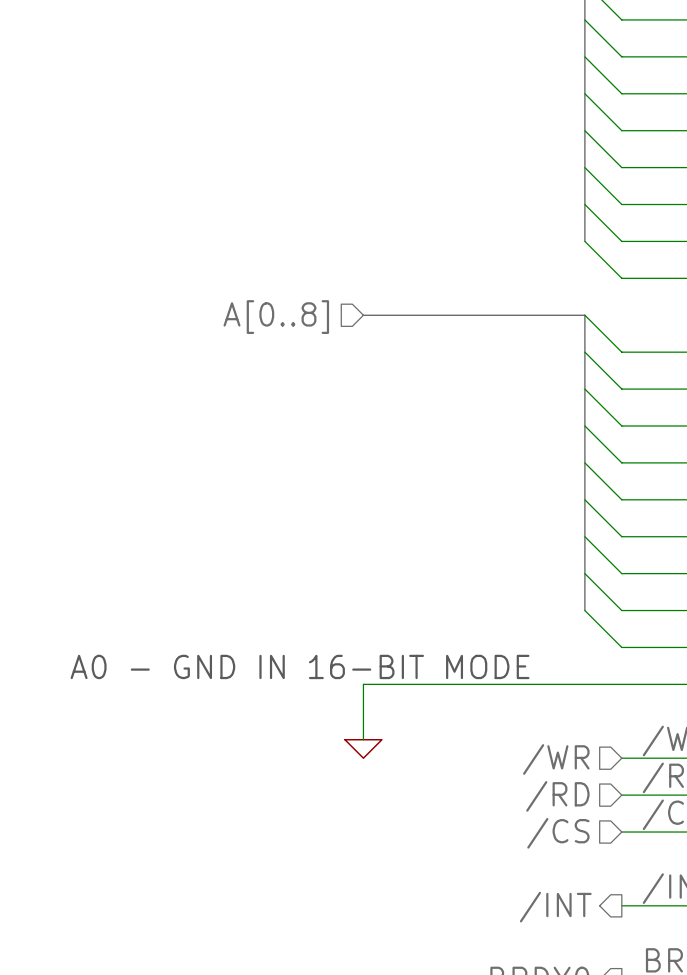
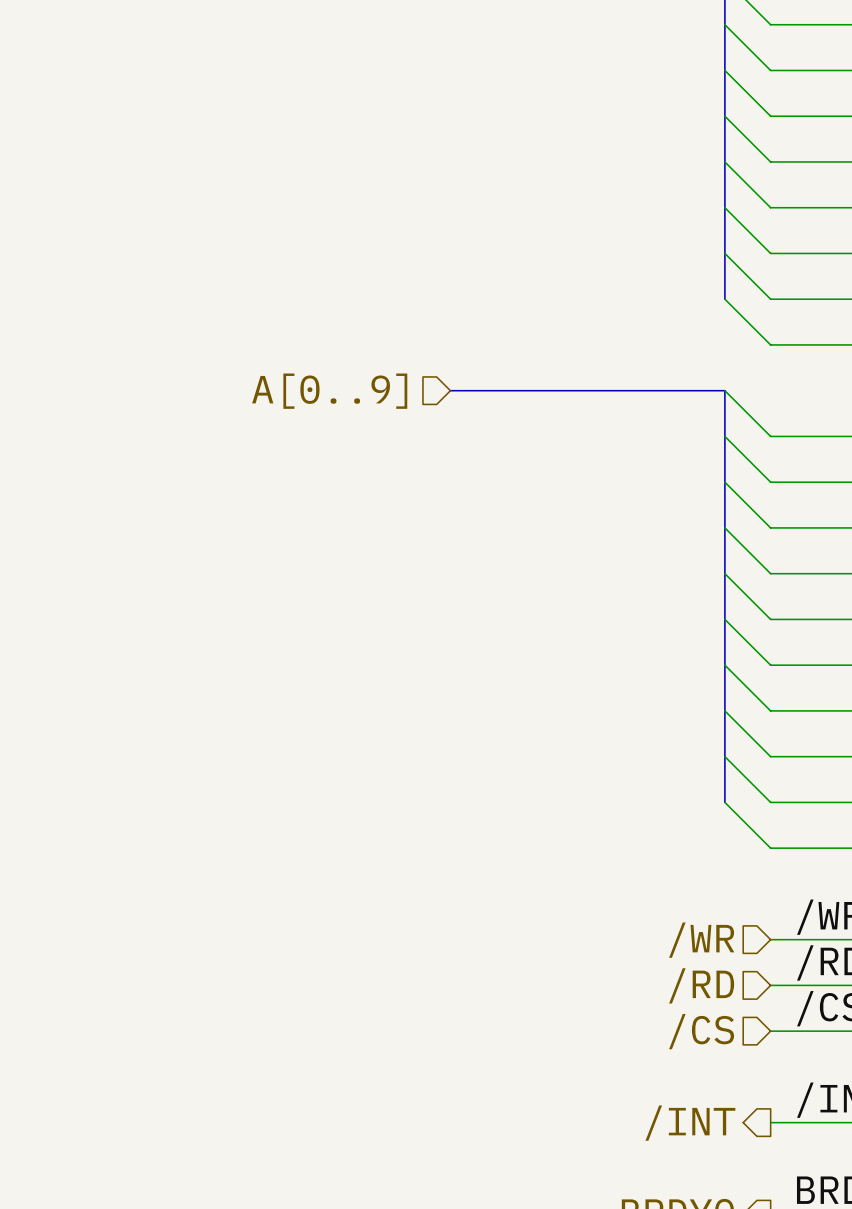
hierarchical label: A[0..8] (276, 317) -> A[0..9] (329, 391)
bus: none -> (724, 756) (724, 802)
text: A0 - GND IN 16-BIT MODE (300, 666) -> none
wire: (621, 684) (363, 684) (363, 739) -> (770, 848) (724, 802)
power symbol: (363, 748) -> none

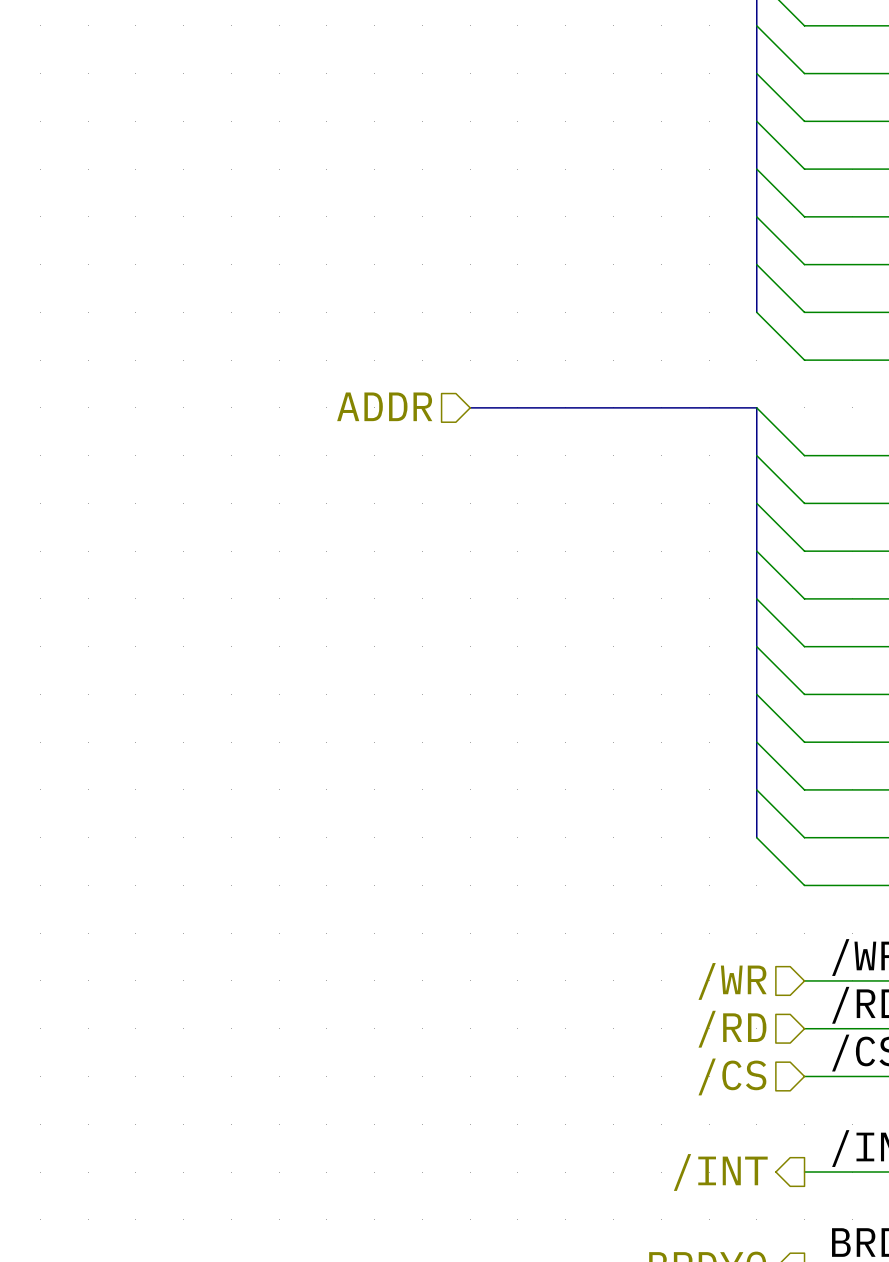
hierarchical label: A[0..9] (329, 391) -> ADDR (384, 406)

